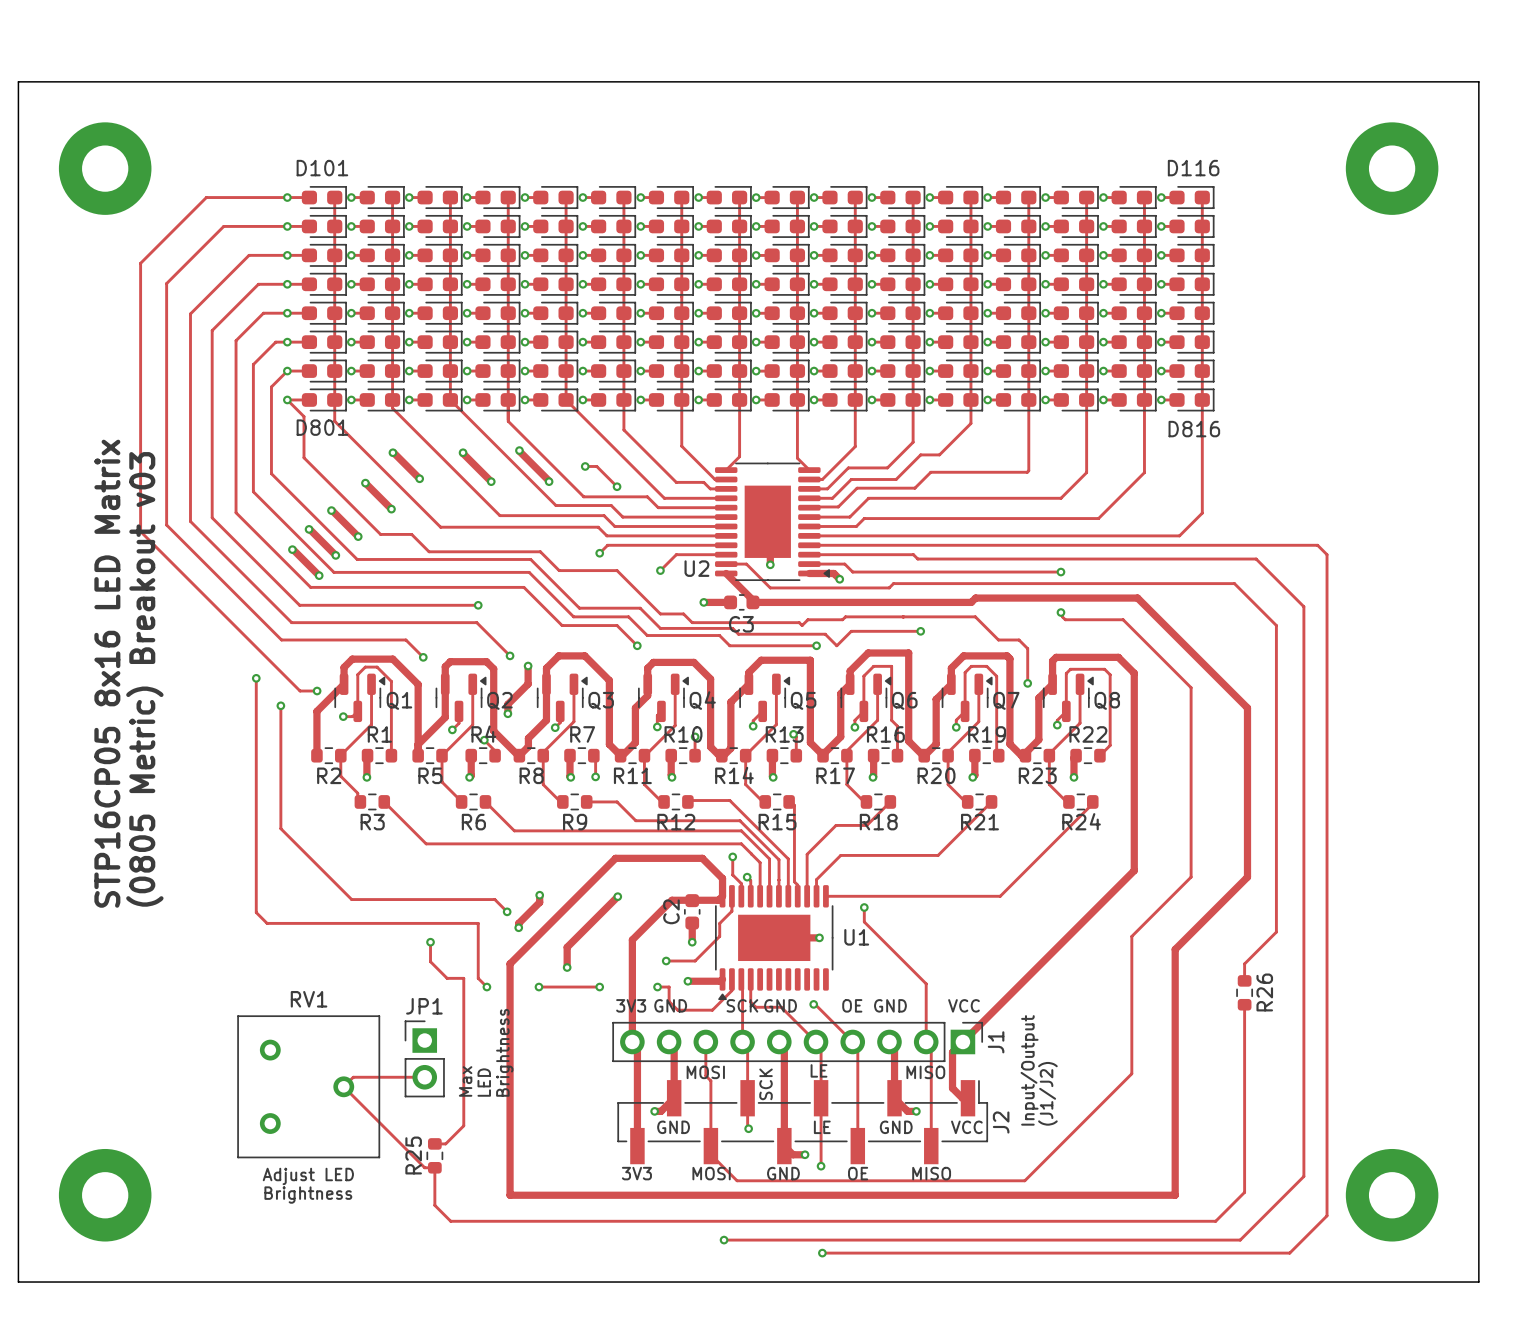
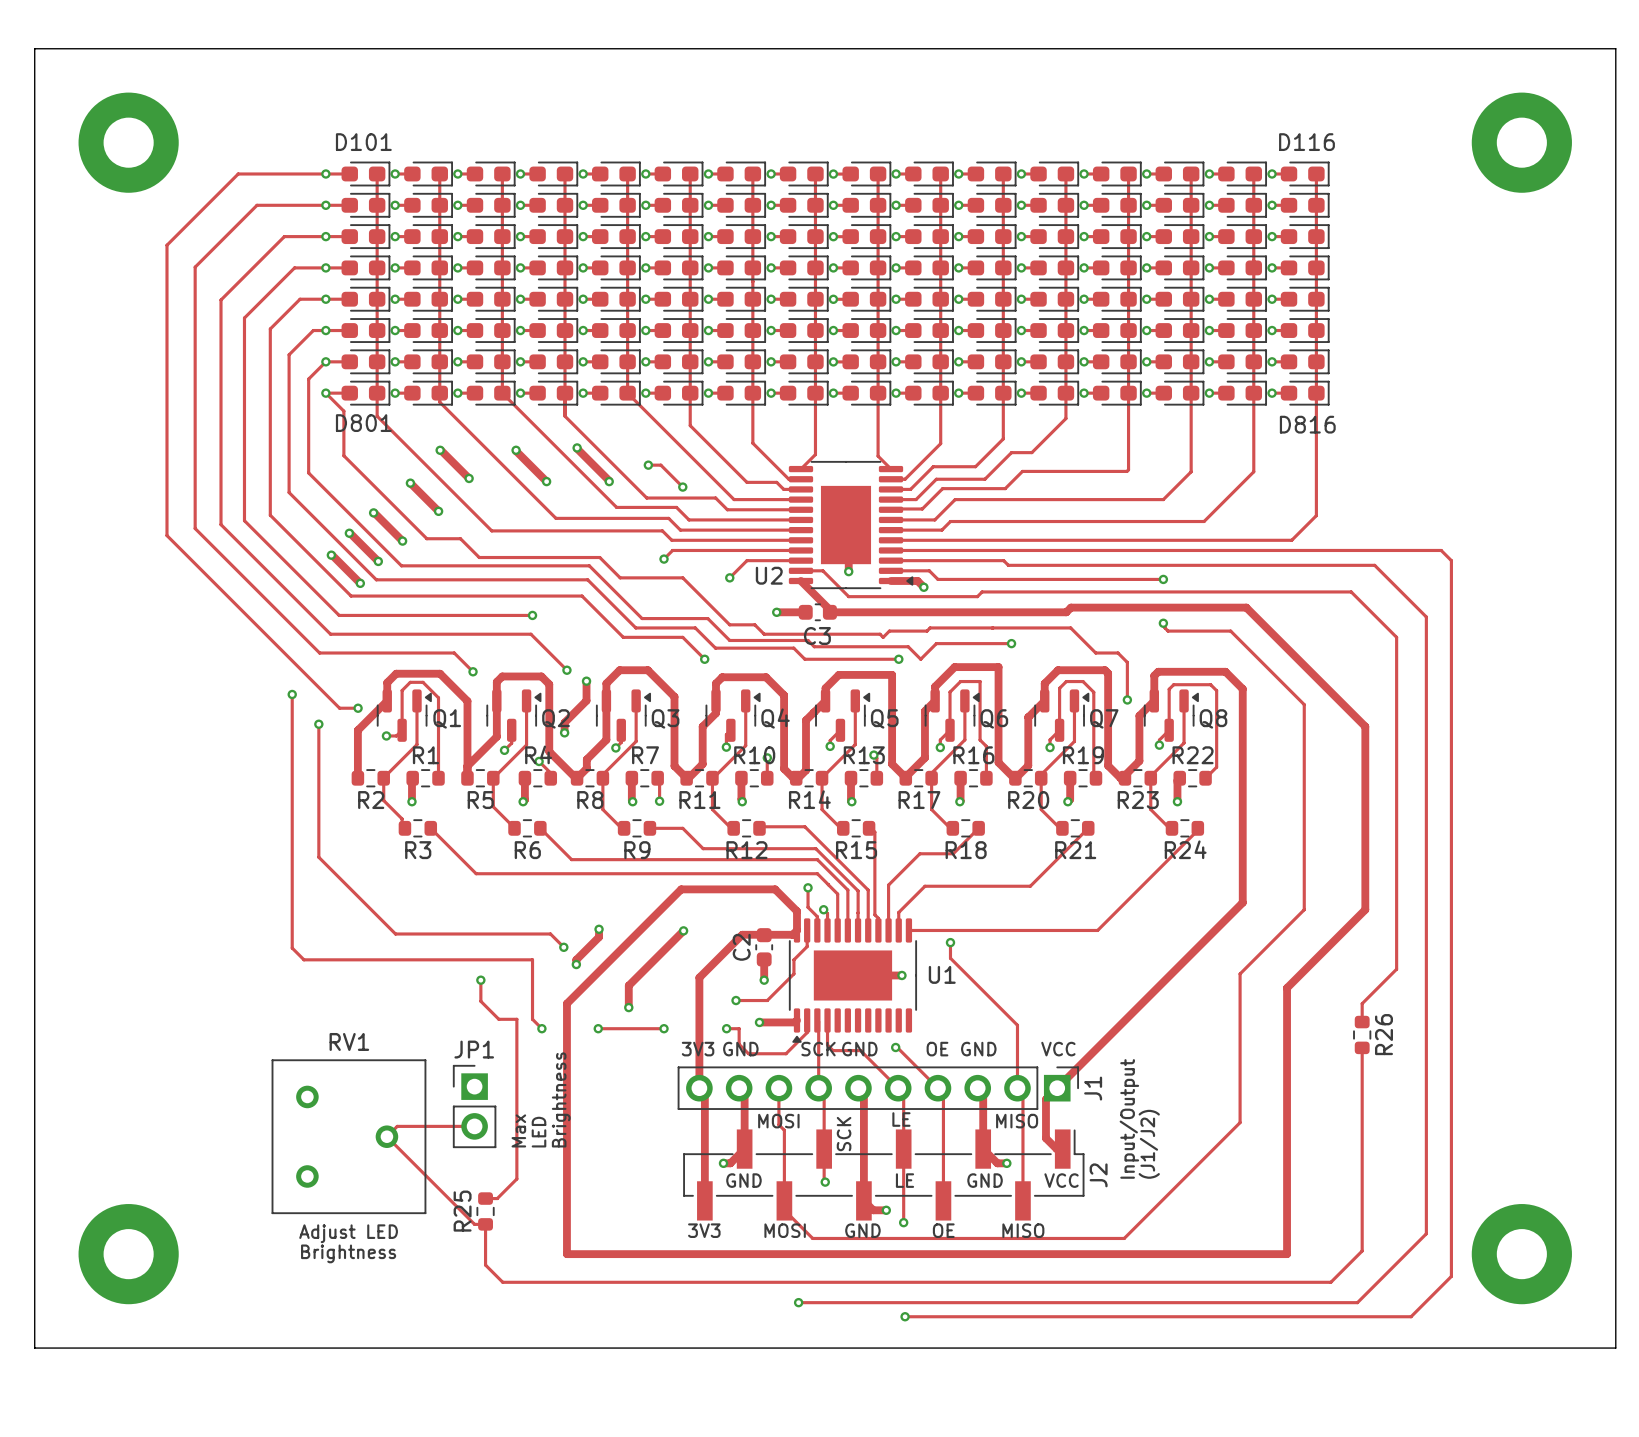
text: STP16CP05 8x16 LED Matrix (107, 673) -> none
text: (0805 Metric) Breakout v03 (144, 679) -> none

